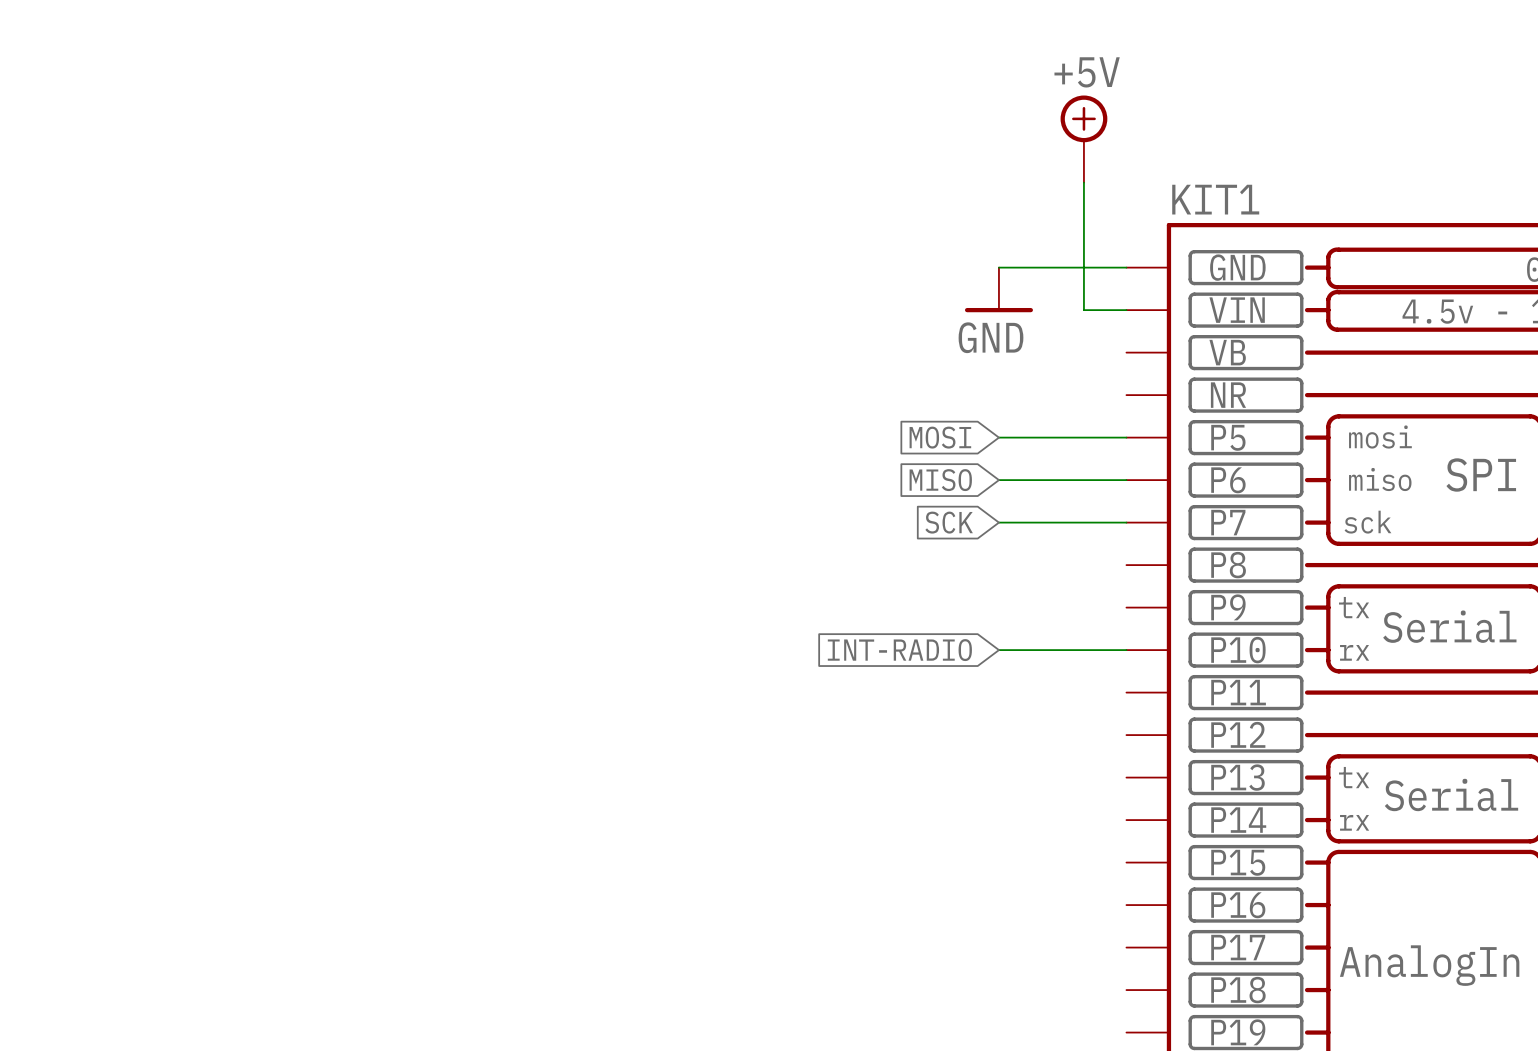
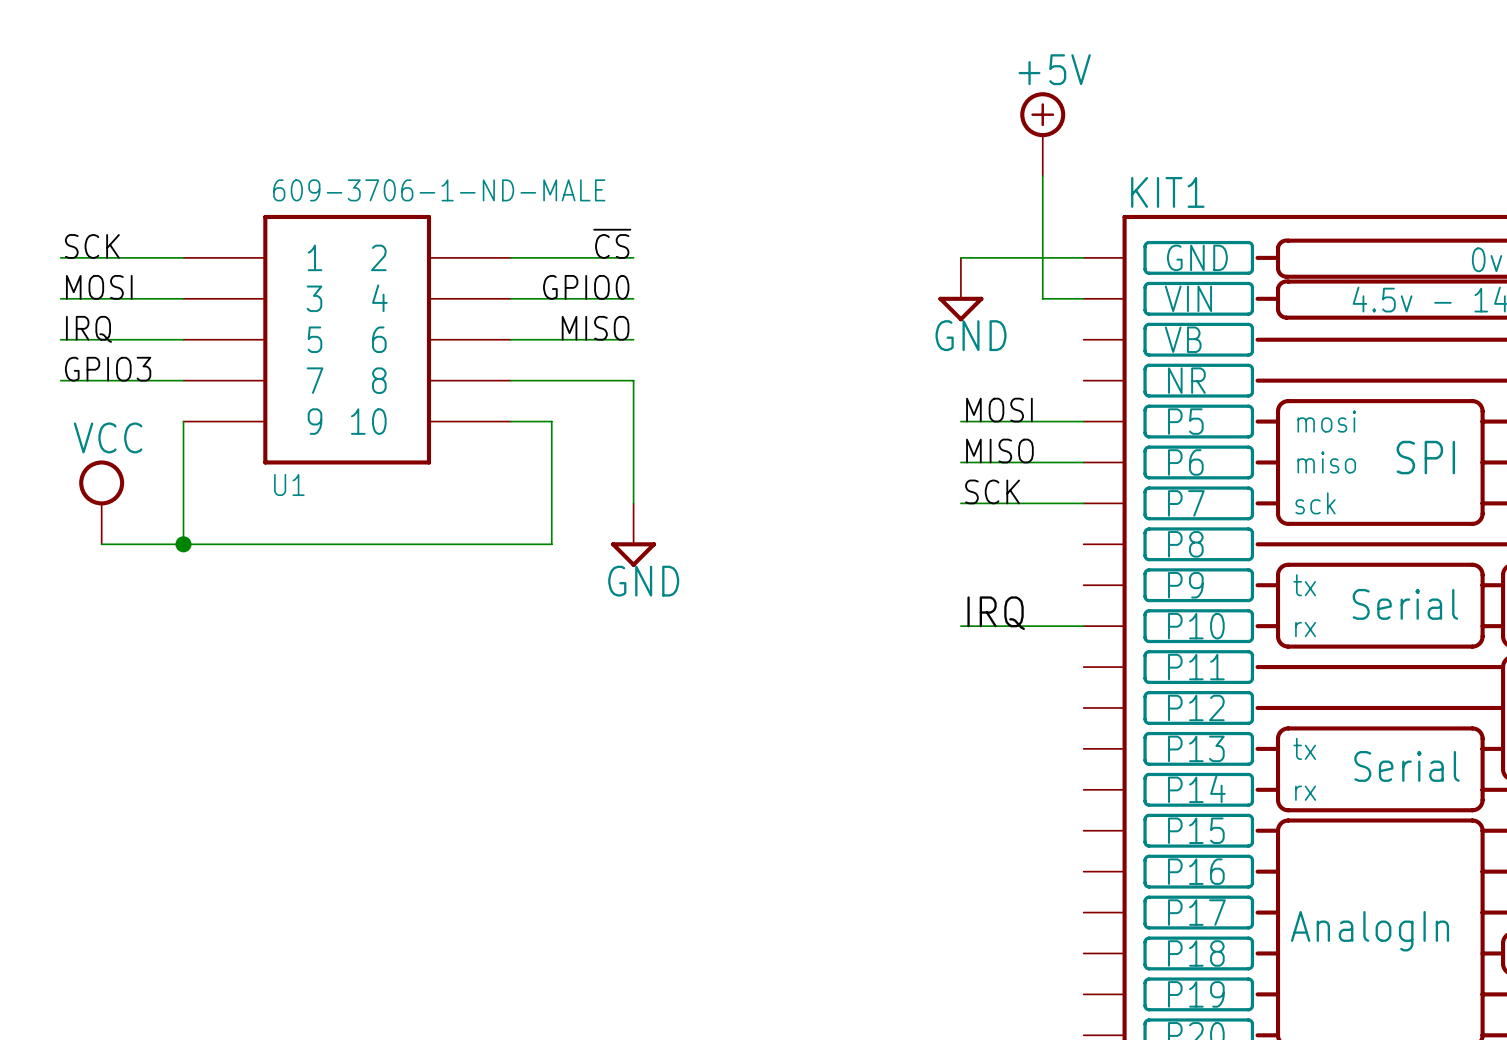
label: none -> ~{CS} (612, 243)
label: none -> SCK (92, 246)
wire: none -> (60, 257) (183, 257)
wire: none -> (510, 257) (633, 257)
power symbol shape: [964, 267, 1033, 313] -> [938, 257, 984, 322]
label: none -> MOSI (99, 287)
label: none -> GPIO0 (586, 287)
wire: none -> (60, 298) (183, 298)
wire: none -> (510, 298) (633, 298)
label: none -> MISO (595, 328)
label: none -> IRQ (88, 329)
wire: none -> (60, 339) (183, 339)
U1: none -> 609-3706-1-ND-MALE (347, 339)
wire: none -> (510, 339) (633, 339)
label: none -> GPIO3 (108, 369)
wire: none -> (60, 380) (183, 380)
wire: none -> (510, 380) (633, 380) (633, 503)
label: none -> MOSI (999, 410)
wire: none -> (183, 421) (183, 544)
wire: none -> (510, 421) (551, 421) (551, 544) (101, 544)
global label: MOSI (940, 437) -> none
label: none -> MISO (999, 451)
global label: MISO (940, 480) -> none
label: none -> SCK (992, 491)
power symbol: none -> VCC (101, 502)
global label: SCK (949, 522) -> none
power symbol: none -> GND (633, 535)
junction: none -> (183, 544)
label: none -> IRQ (996, 613)
global label: INT-RADIO (899, 650) -> none

